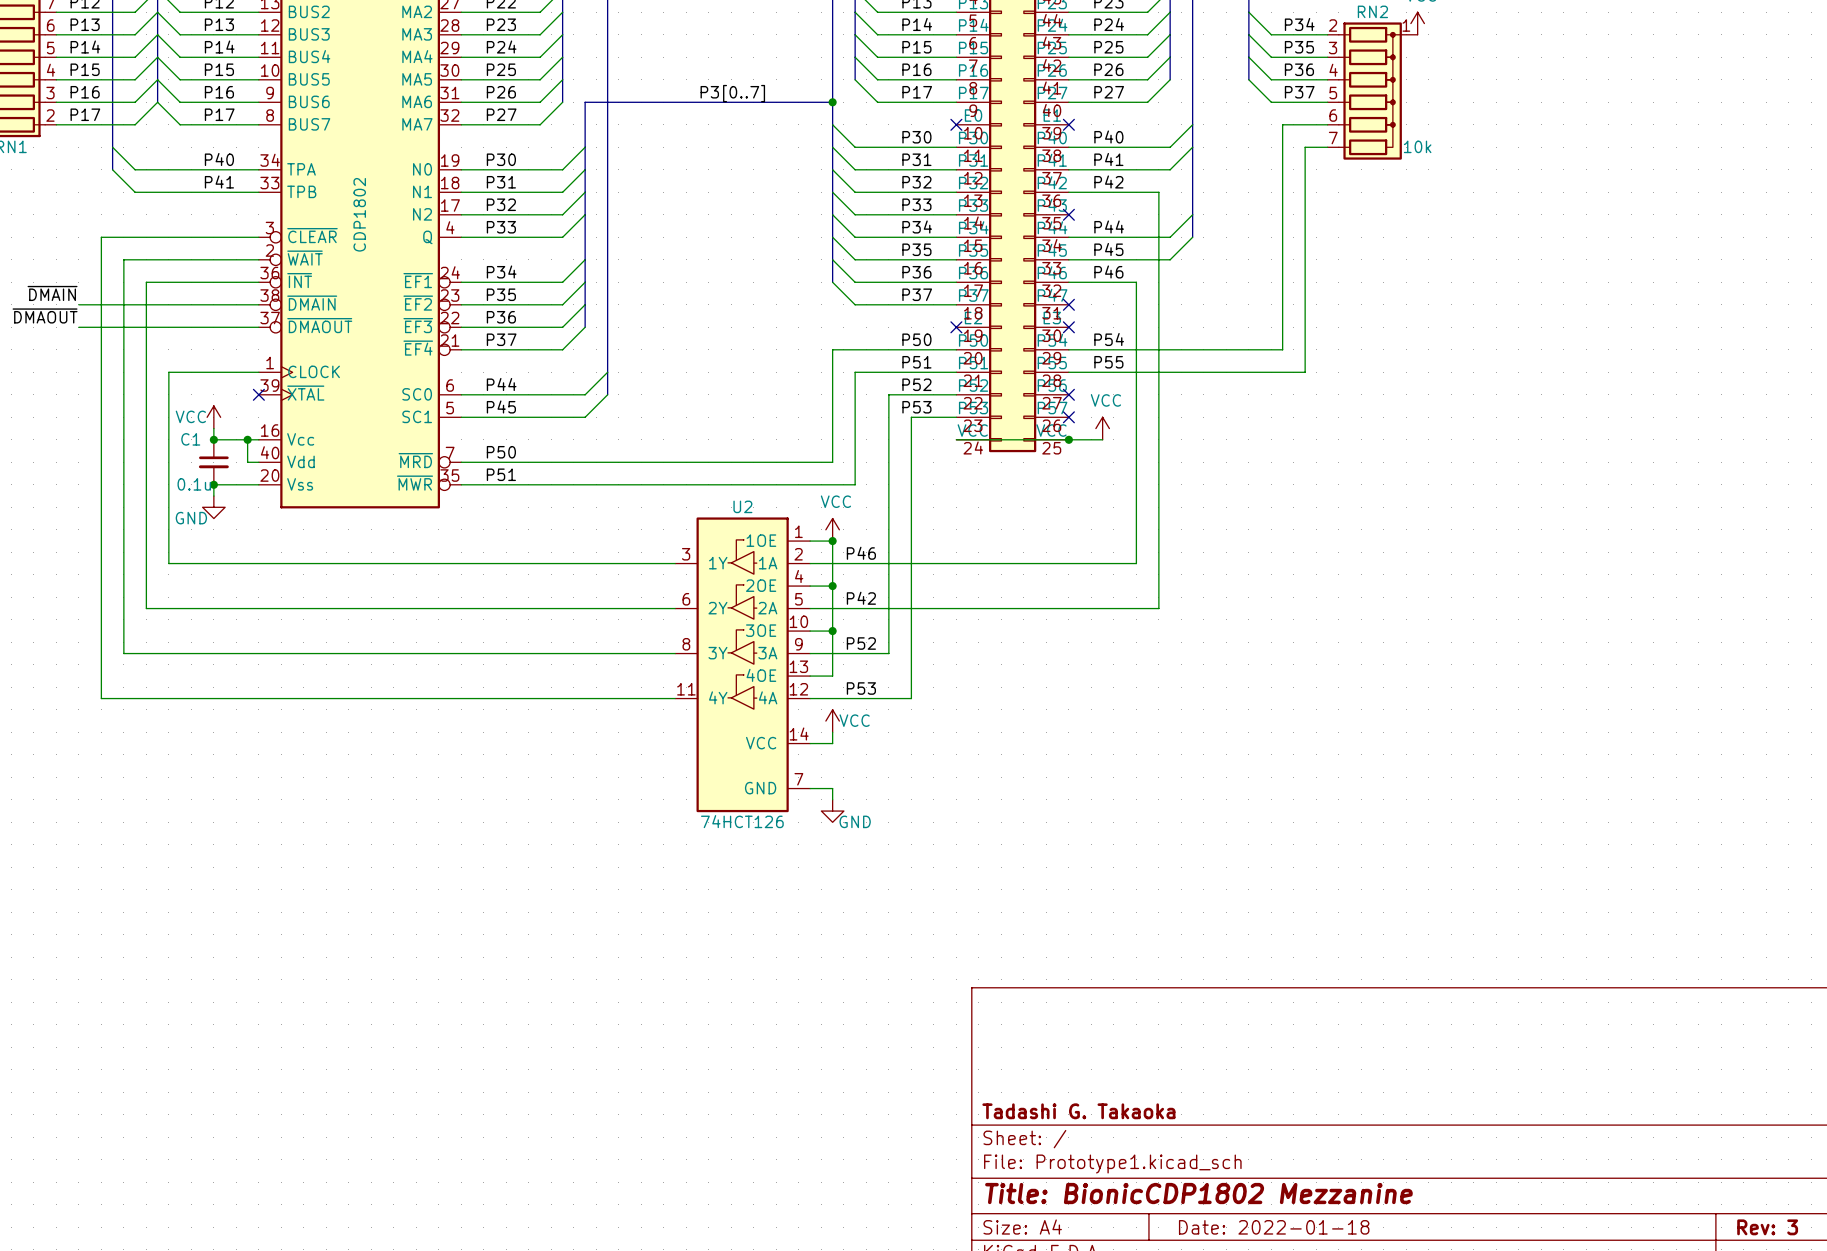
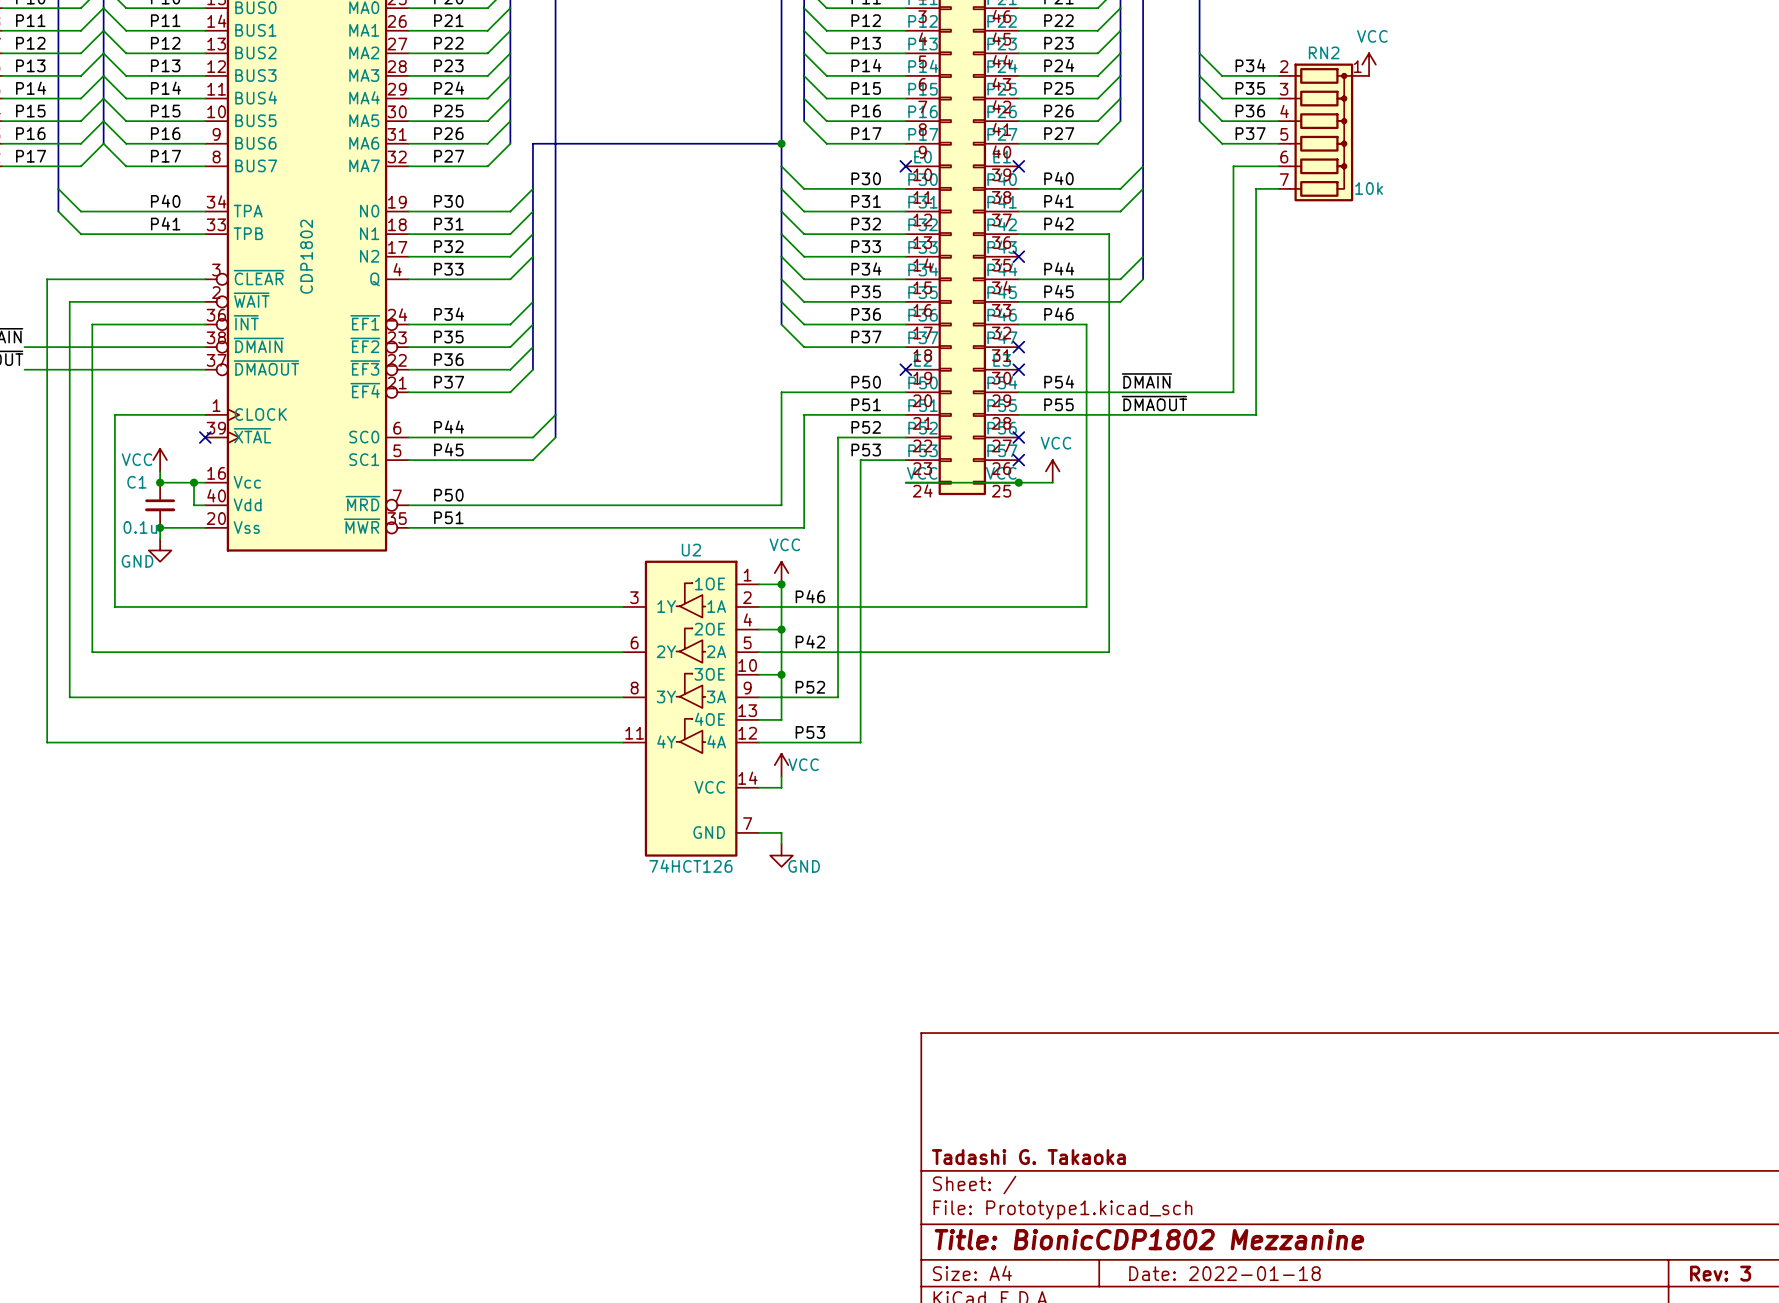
label: P3[0..7] (732, 93) -> none
label: none -> ~{DMAIN} (1146, 380)
label: none -> ~{DMAOUT} (1154, 403)

